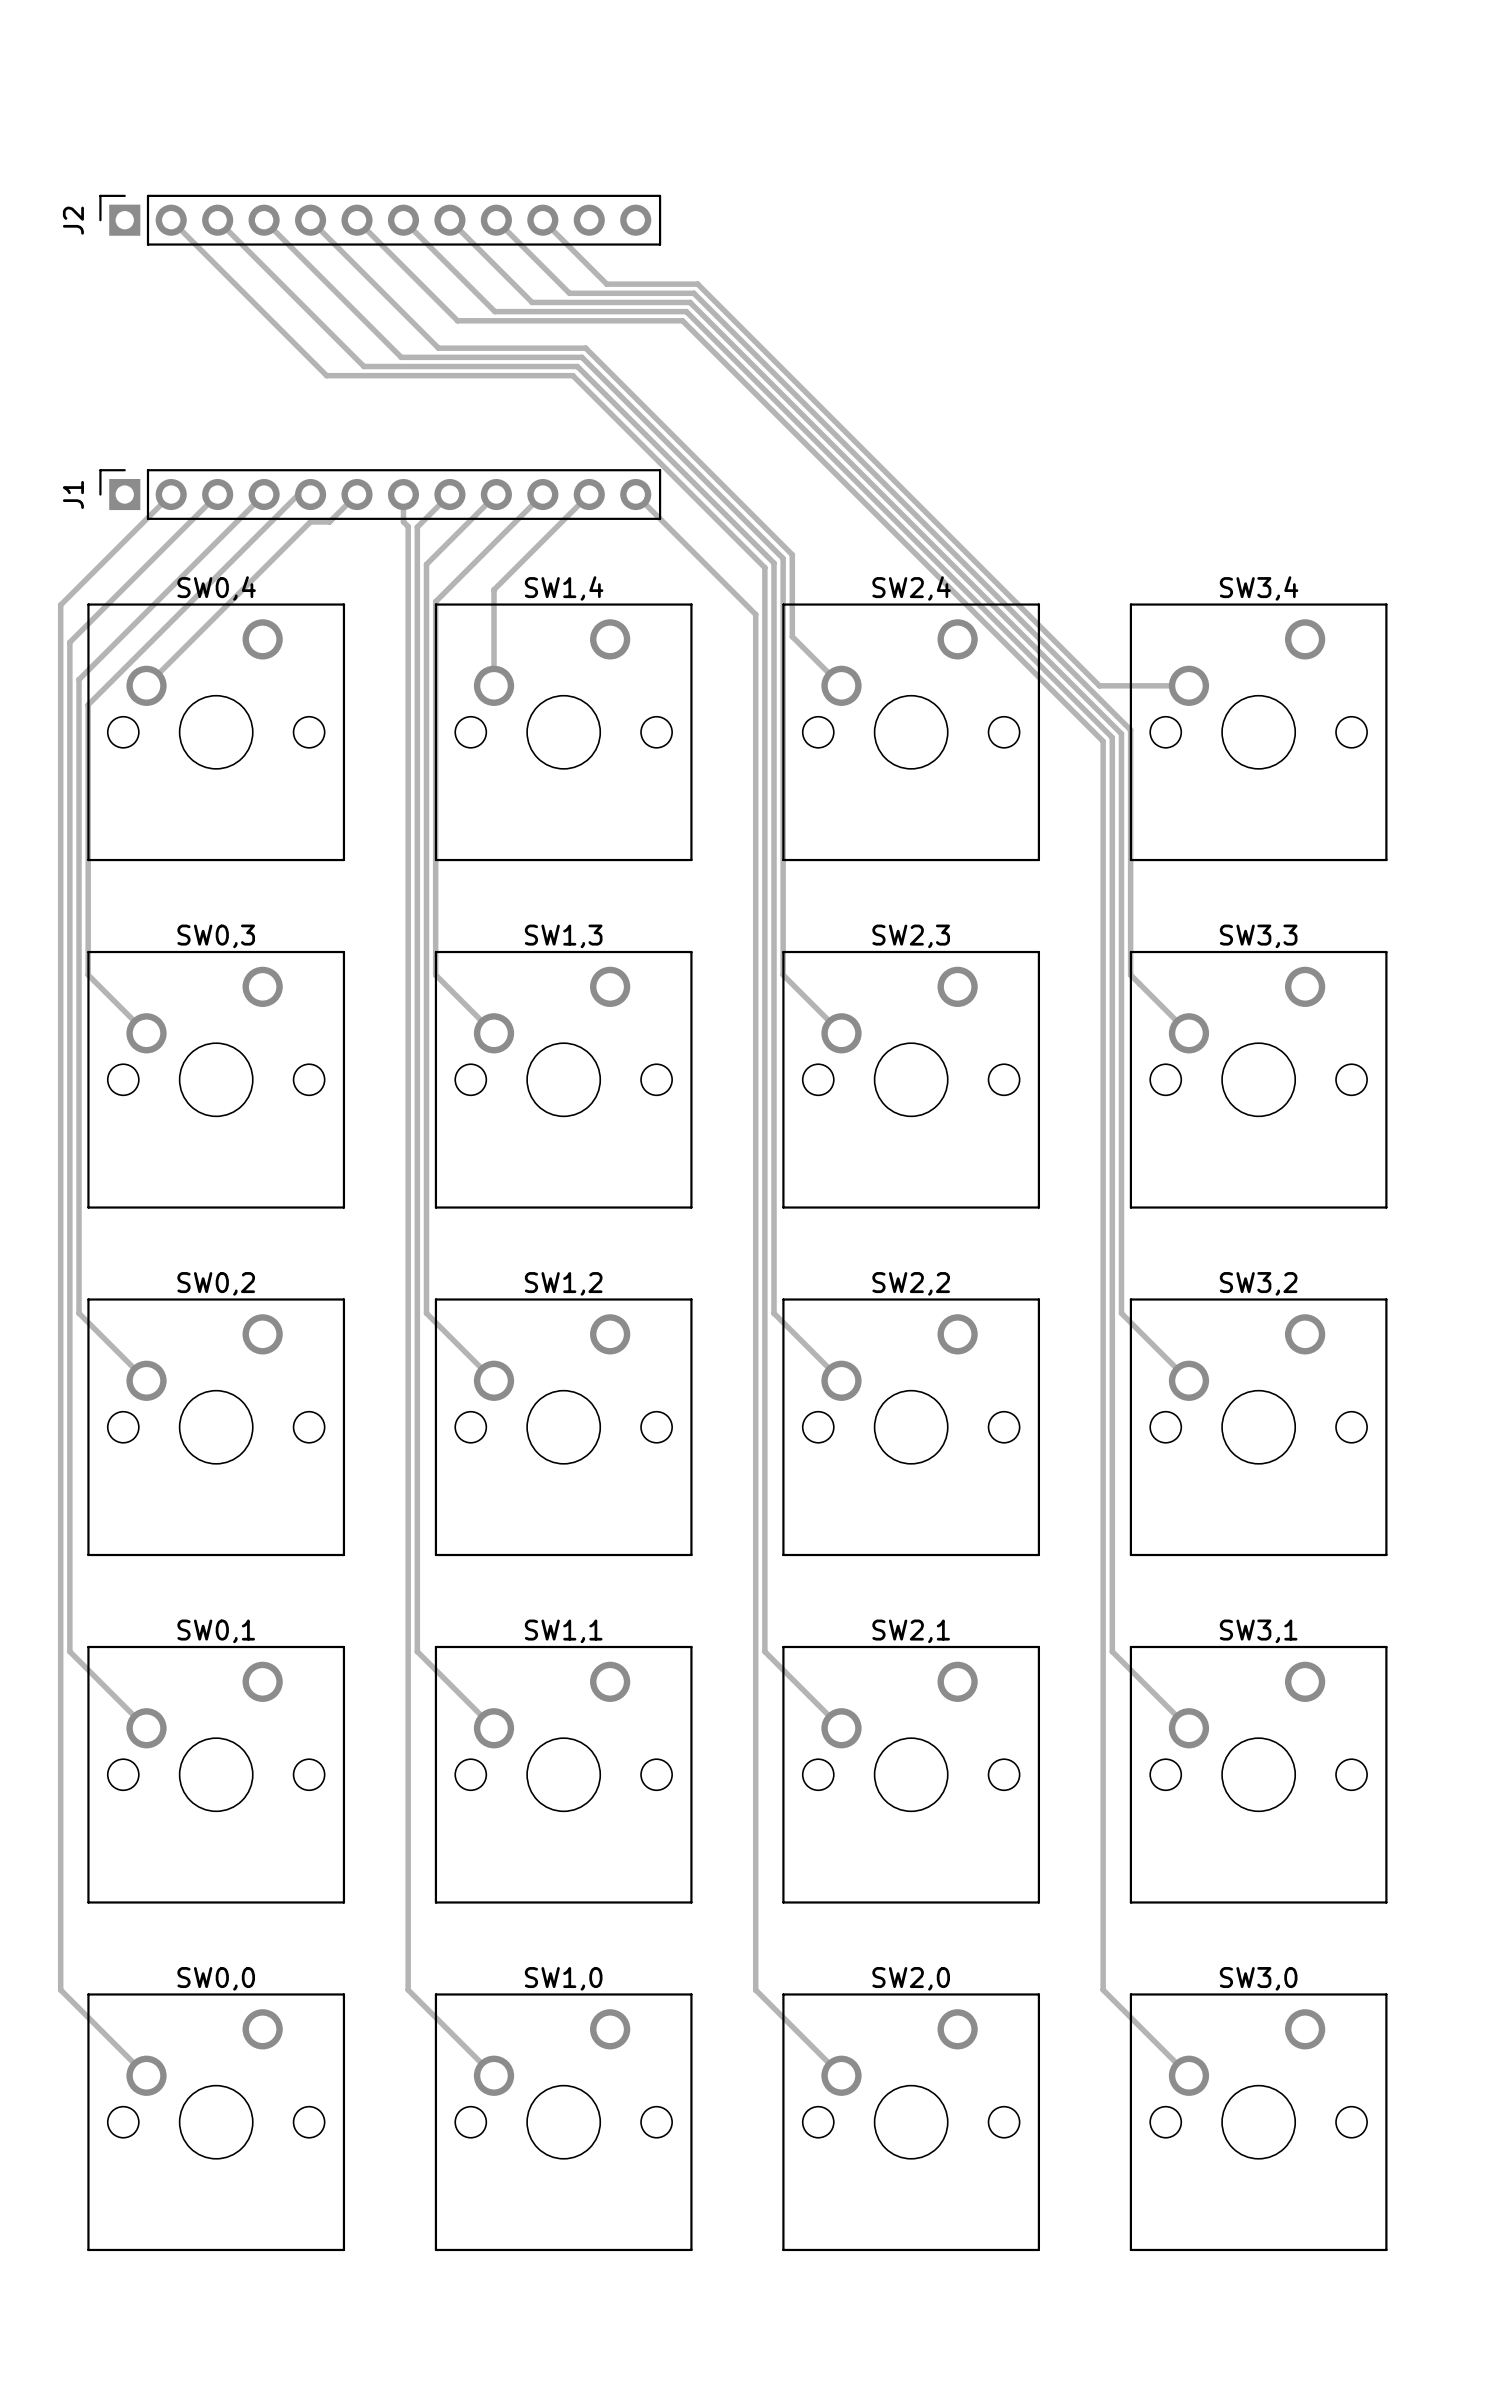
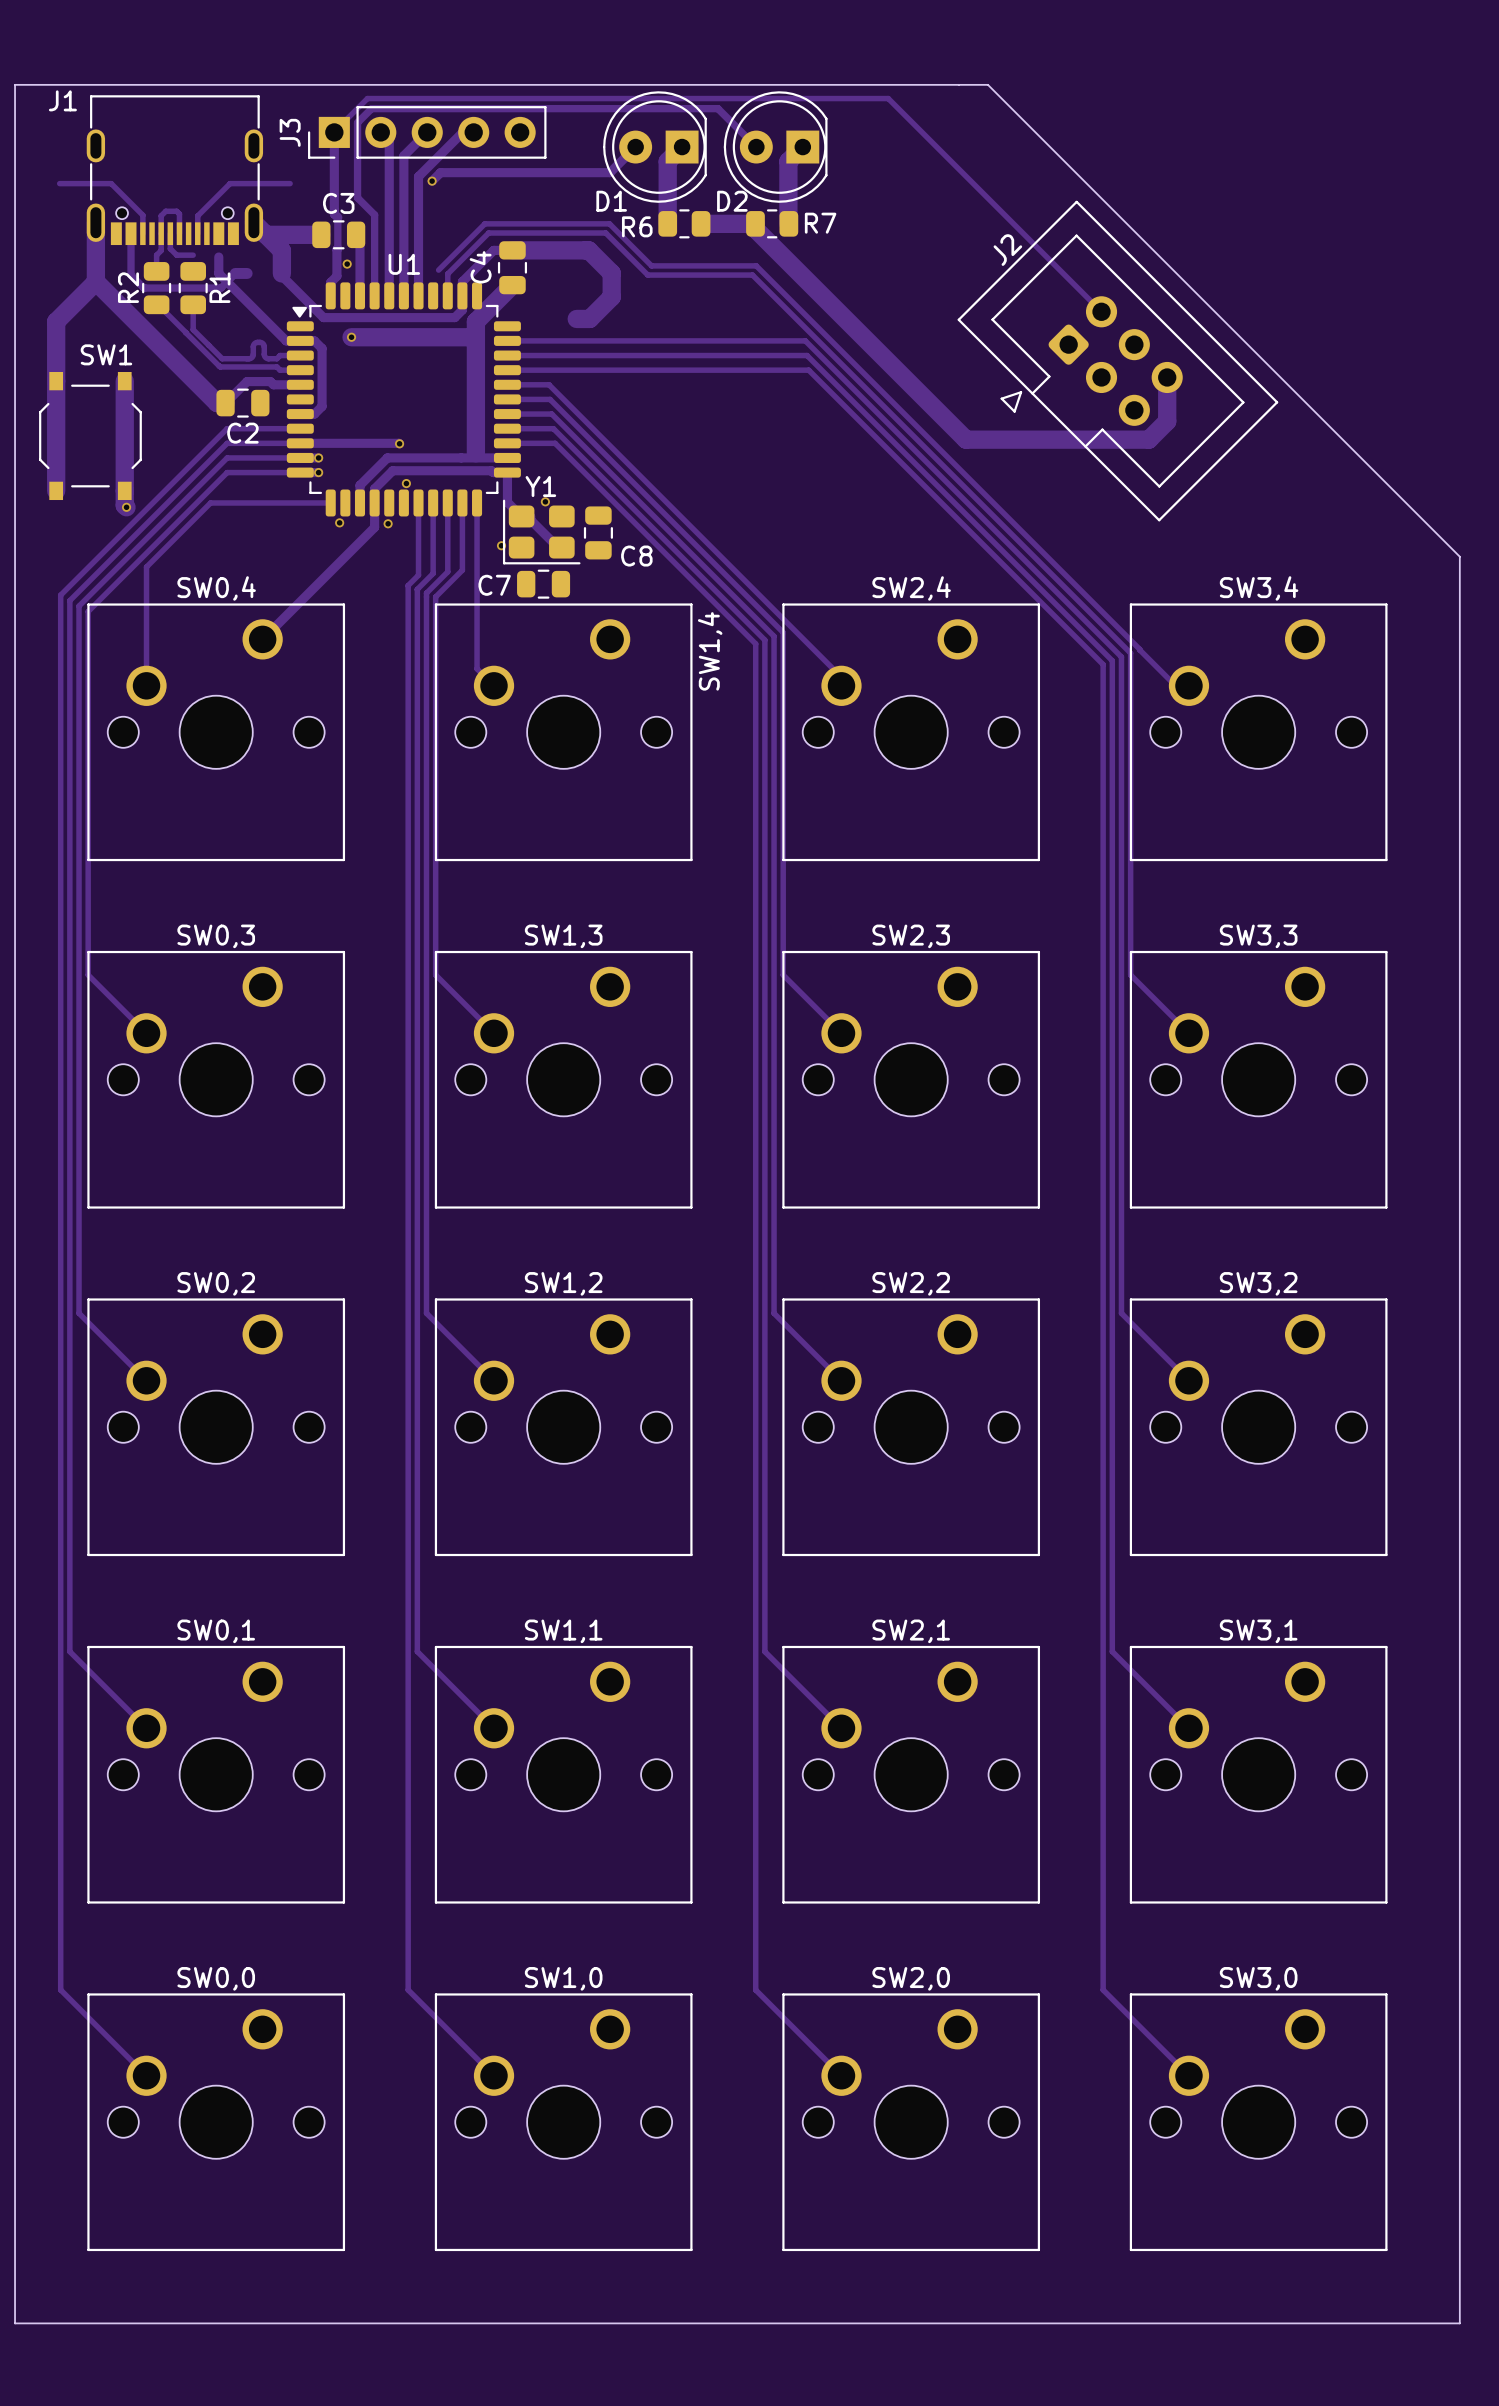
board edge: none -> (15, 84) (987, 84) (1459, 556) (1459, 2323) (15, 2323) (15, 84)
track: none -> (334, 121) (334, 213) (337, 217) (337, 248) (336, 276) (330, 282) (330, 295)
track: none -> (334, 132) (367, 98) (888, 98) (1101, 311)
track: none -> (380, 132) (389, 140) (389, 295)
track: none -> (427, 132) (403, 155) (403, 295)
J3: none -> (427, 132)
track: none -> (473, 132) (462, 132) (418, 176) (418, 295)
track: none -> (635, 147) (610, 172) (440, 172) (432, 181)
D1: none -> (654, 147)
track: none -> (682, 147) (667, 161) (667, 223)
track: none -> (756, 147) (717, 108) (371, 108) (357, 122) (357, 197) (374, 214) (374, 295)
D2: none -> (775, 147)
track: none -> (802, 147) (788, 161) (788, 223)
via: none -> (432, 181)
track: none -> (59, 183) (111, 183) (142, 215) (142, 233)
track: none -> (290, 183) (230, 183) (197, 215) (197, 233)
J2 footprint: [99, 194, 662, 246] -> [957, 200, 1279, 522]
J2 name position: J2 (73, 220) -> J2 (1007, 250)
track: (171, 220) (326, 375) (572, 375) (764, 567) (764, 640) -> (507, 428) (553, 428) (764, 640)
track: (217, 220) (363, 366) (577, 366) (774, 563) (774, 636) -> (507, 414) (551, 414) (774, 636)
track: (264, 220) (401, 357) (581, 357) (783, 558) (783, 632) -> (507, 399) (550, 399) (783, 632)
track: (310, 220) (438, 348) (585, 348) (792, 554) (792, 636) (841, 685) -> (507, 384) (549, 384) (841, 677) (841, 685)
track: (357, 220) (457, 320) (682, 320) (1103, 741) -> (507, 370) (808, 370) (1103, 664) (1103, 741)
track: (403, 220) (494, 311) (686, 311) (1112, 737) -> (507, 355) (807, 355) (1112, 660) (1112, 737)
track: (449, 220) (532, 302) (690, 302) (1121, 733) -> (507, 340) (805, 340) (1121, 656) (1121, 733)
track: (496, 220) (569, 293) (693, 293) (1130, 729) -> (447, 295) (447, 273) (488, 233) (605, 233) (647, 275) (752, 275) (1130, 653) (1130, 729)
track: (542, 220) (606, 284) (697, 284) (1099, 685) (1175, 685) -> (438, 270) (484, 223) (609, 223) (651, 265) (756, 265) (1175, 685)
track: none -> (95, 222) (95, 281) (56, 321) (56, 490)
track: none -> (253, 222) (281, 250) (281, 275) (323, 317) (454, 317) (462, 310) (462, 281) (493, 250) (588, 250) (611, 273) (611, 297) (589, 318) (576, 318)
R6: none -> (684, 223)
track: none -> (701, 223) (755, 223) (755, 229) (966, 439) (1148, 439) (1167, 421) (1167, 377)
R7: none -> (772, 223)
track: none -> (131, 233) (131, 275) (144, 288) (221, 288) (235, 273) (247, 273)
track: none -> (170, 233) (170, 248) (176, 255) (193, 255)
track: none -> (179, 233) (179, 214) (176, 211) (165, 211) (161, 215) (161, 250) (156, 255) (156, 271)
track: none -> (266, 234) (321, 234)
C3: none -> (338, 234)
track: none -> (356, 234) (359, 238) (359, 295)
track: none -> (218, 257) (218, 273) (286, 340) (314, 340) (322, 348) (322, 406) (314, 414) (300, 414)
via: none -> (347, 264)
C4: none -> (512, 267)
track: none -> (95, 281) (217, 403) (225, 403) (247, 381) (270, 381) (273, 384) (300, 384)
track: none -> (512, 285) (475, 321) (475, 453)
R2: none -> (156, 288)
R1: none -> (193, 288)
track: none -> (156, 304) (185, 332)
track: none -> (193, 304) (193, 329) (222, 358) (250, 358) (253, 355) (253, 344) (257, 342) (263, 344) (264, 355) (267, 358) (276, 358) (280, 355) (300, 355)
track: none -> (185, 332) (219, 366)
track: none -> (351, 337) (472, 337) (475, 340)
via: none -> (351, 337)
track: none -> (219, 366) (276, 366) (280, 370) (300, 370)
track: none -> (124, 381) (124, 505) (126, 507)
U1: none -> (403, 399)
C2: none -> (242, 403)
SW1: none -> (90, 436)
via: none -> (399, 443)
via: none -> (318, 457)
track: none -> (507, 457) (387, 457) (359, 485) (359, 502)
J1 footprint: [99, 469, 662, 520] -> [86, 95, 264, 246]
via: none -> (318, 472)
via: none -> (406, 483)
J1 name position: J1 (73, 494) -> J1 (62, 100)
track: (171, 494) (60, 605) -> (300, 428) (227, 428) (60, 595) (60, 605)
track: (217, 494) (69, 642) -> (399, 443) (227, 443) (69, 600) (69, 642)
track: (264, 494) (79, 679) -> (318, 457) (227, 457) (79, 606) (79, 679)
track: (310, 494) (298, 494) (88, 704) -> (318, 472) (227, 472) (88, 611) (88, 704)
track: (357, 494) (329, 521) (310, 521) (146, 685) -> (330, 502) (210, 502) (146, 567) (146, 685)
track: (403, 494) (403, 521) (408, 526) (408, 585) -> (418, 502) (418, 575) (408, 585)
track: (449, 494) (417, 527) (417, 589) -> (433, 502) (433, 573) (417, 589)
track: (496, 494) (426, 564) (426, 593) -> (447, 502) (447, 571) (426, 593)
track: (542, 494) (435, 601) -> (462, 502) (462, 570) (435, 596) (435, 601)
track: (589, 494) (494, 589) (494, 685) -> (477, 502) (477, 668) (494, 685)
track: (635, 494) (755, 614) (755, 643) -> (507, 443) (555, 443) (755, 643)
via: none -> (545, 501)
via: none -> (126, 507)
via: none -> (339, 522)
via: none -> (388, 523)
Y1: none -> (541, 532)
C8: none -> (598, 532)
via: none -> (501, 545)
track: none -> (561, 547) (558, 547) (530, 520) (530, 516) (521, 516) (507, 502) (507, 472) (493, 472) (491, 470) (392, 470) (374, 488) (374, 527) (262, 639)
C7: none -> (543, 584)
SW1,4 name rotation: 0° (564, 588) -> 90° counterclockwise (710, 651)
SW1,4 name position: SW1,4 (564, 588) -> SW1,4 (710, 651)

